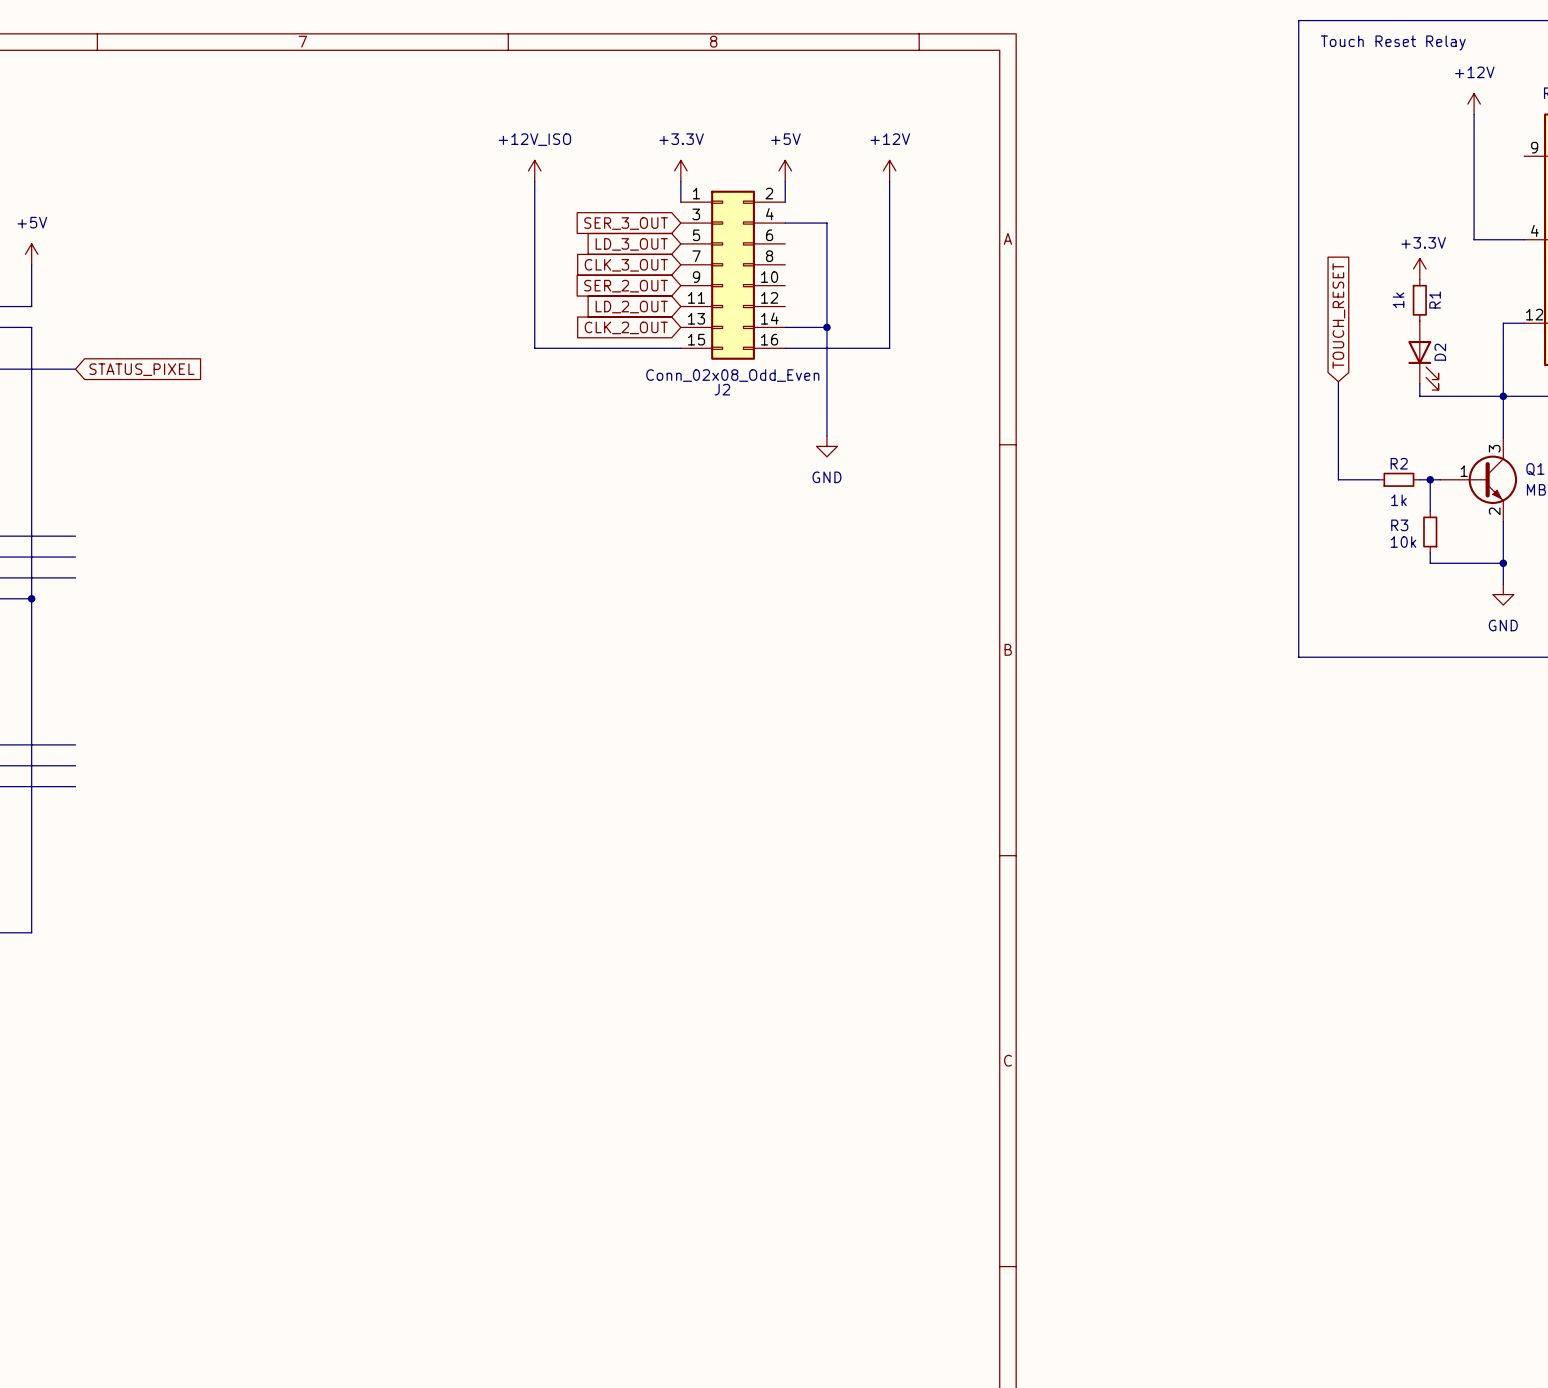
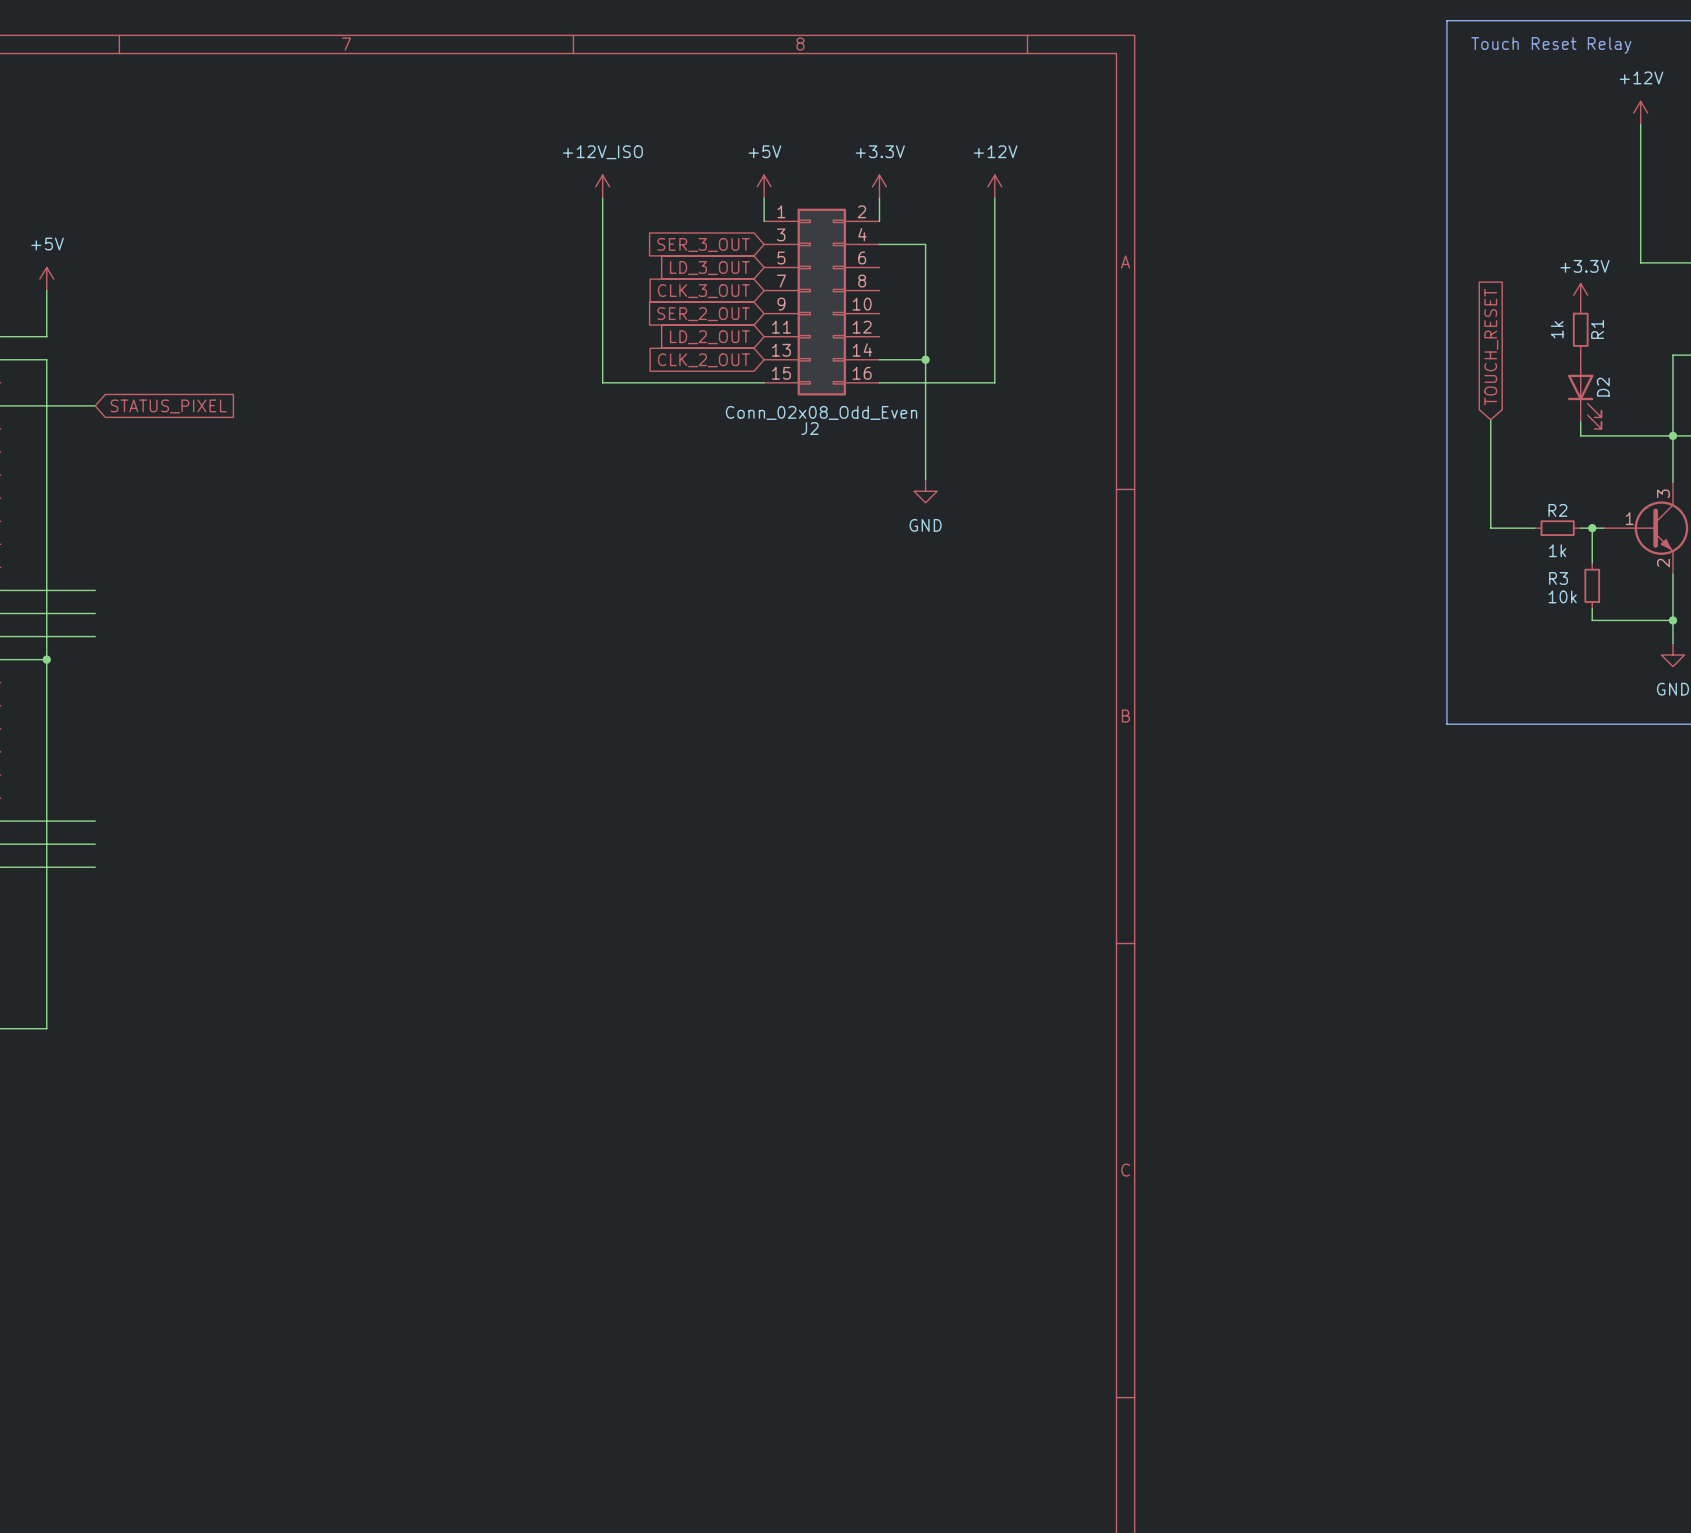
power symbol: +3.3V (680, 170) -> +5V (764, 186)
power symbol: +5V (785, 170) -> +3.3V (879, 186)

